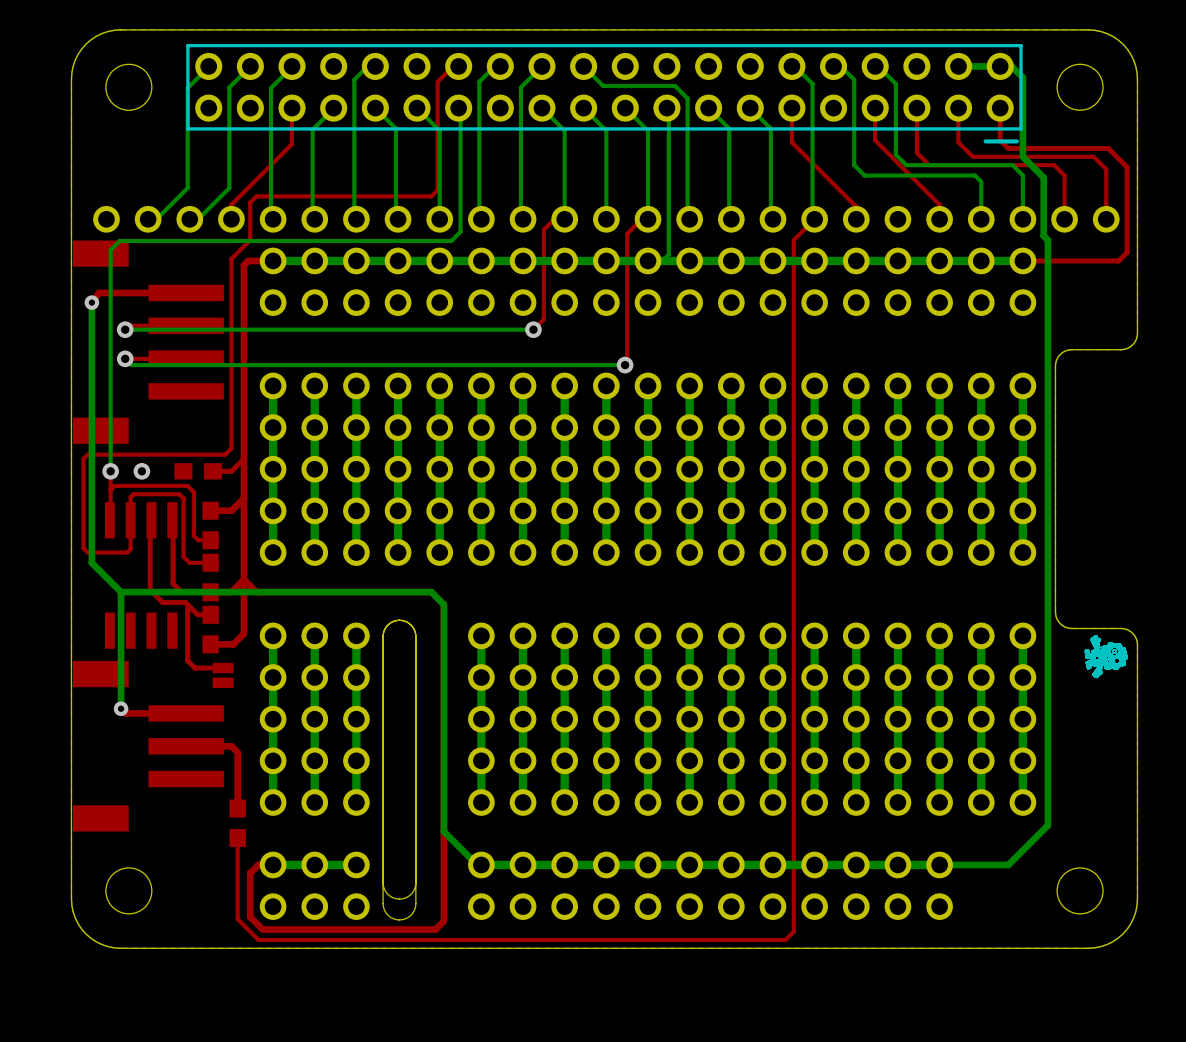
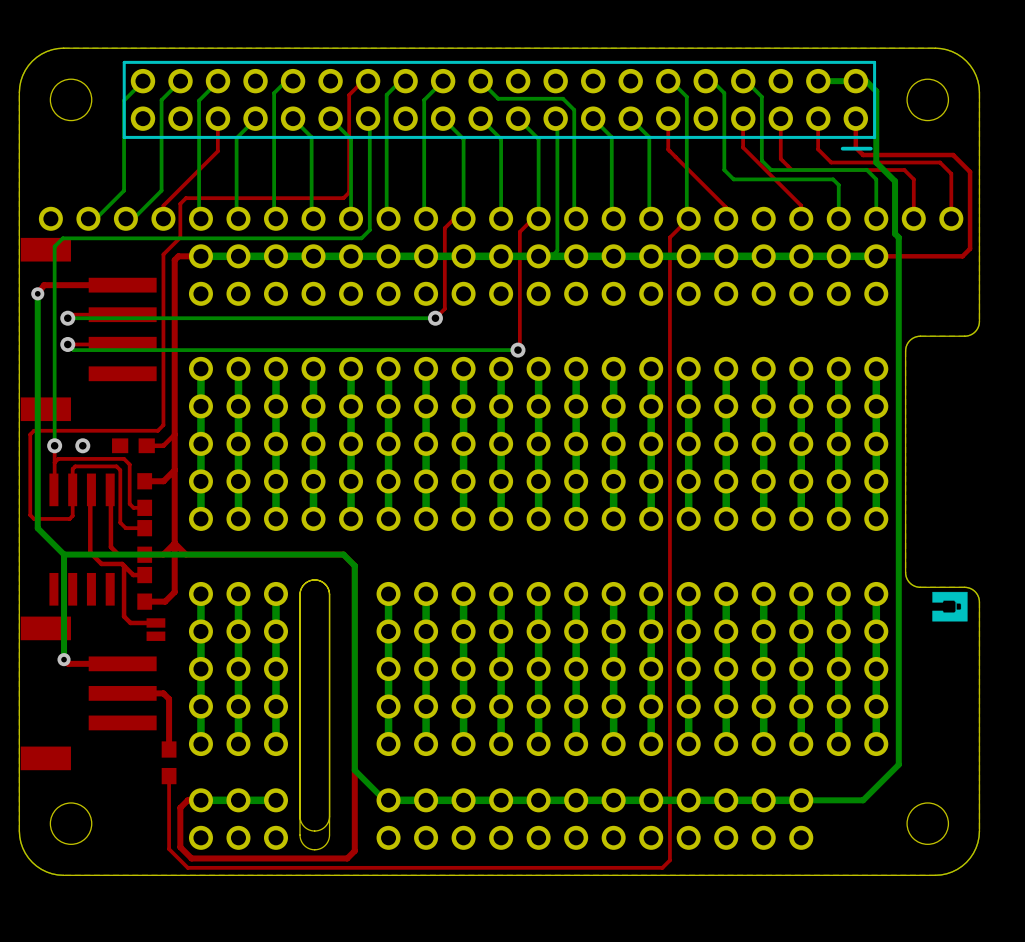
drawing shape: [1084, 635, 1128, 678] -> [932, 591, 968, 622]

